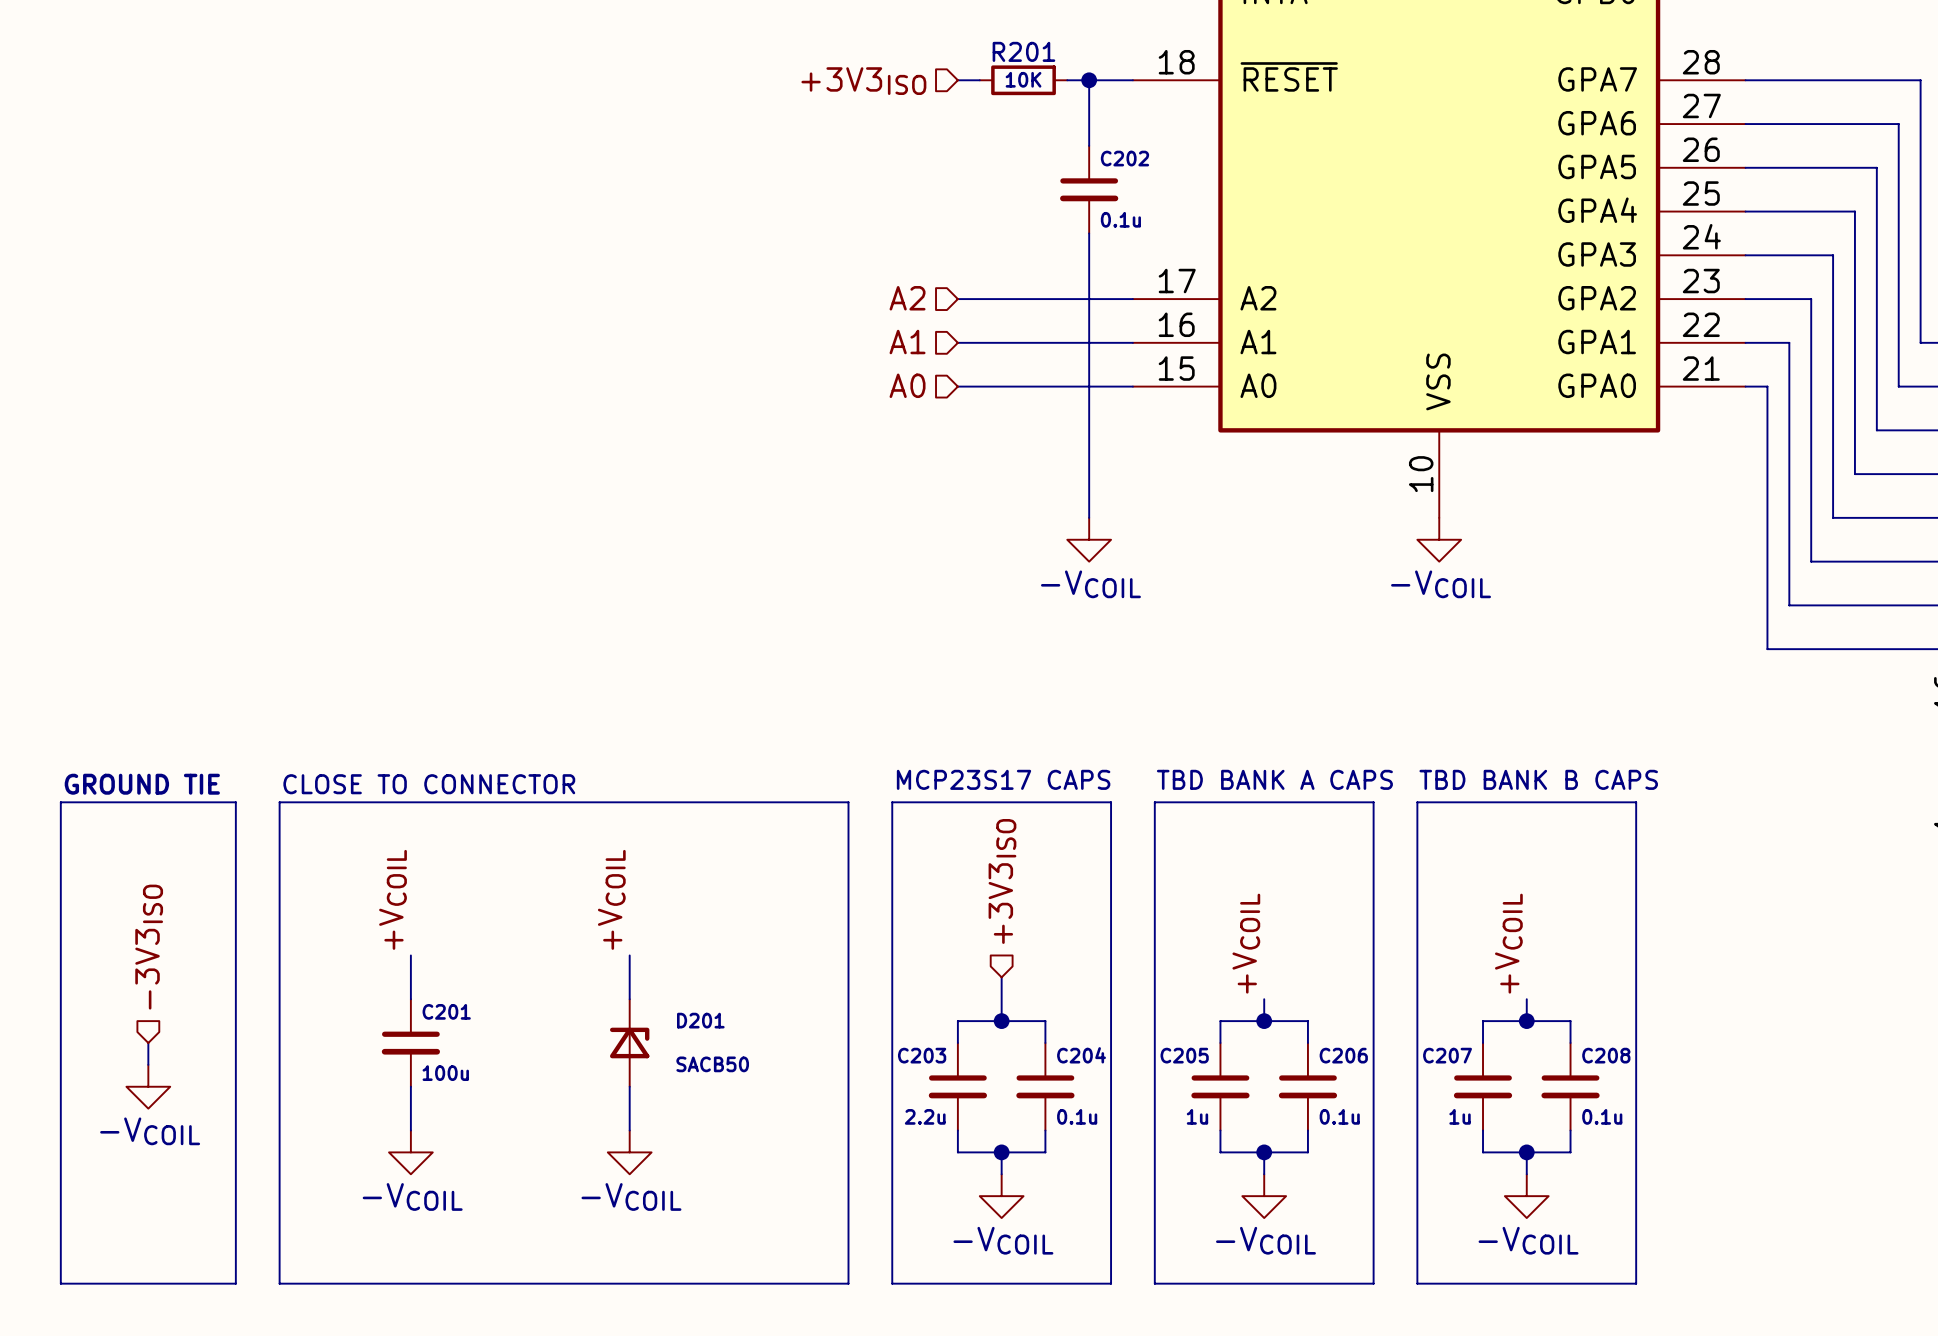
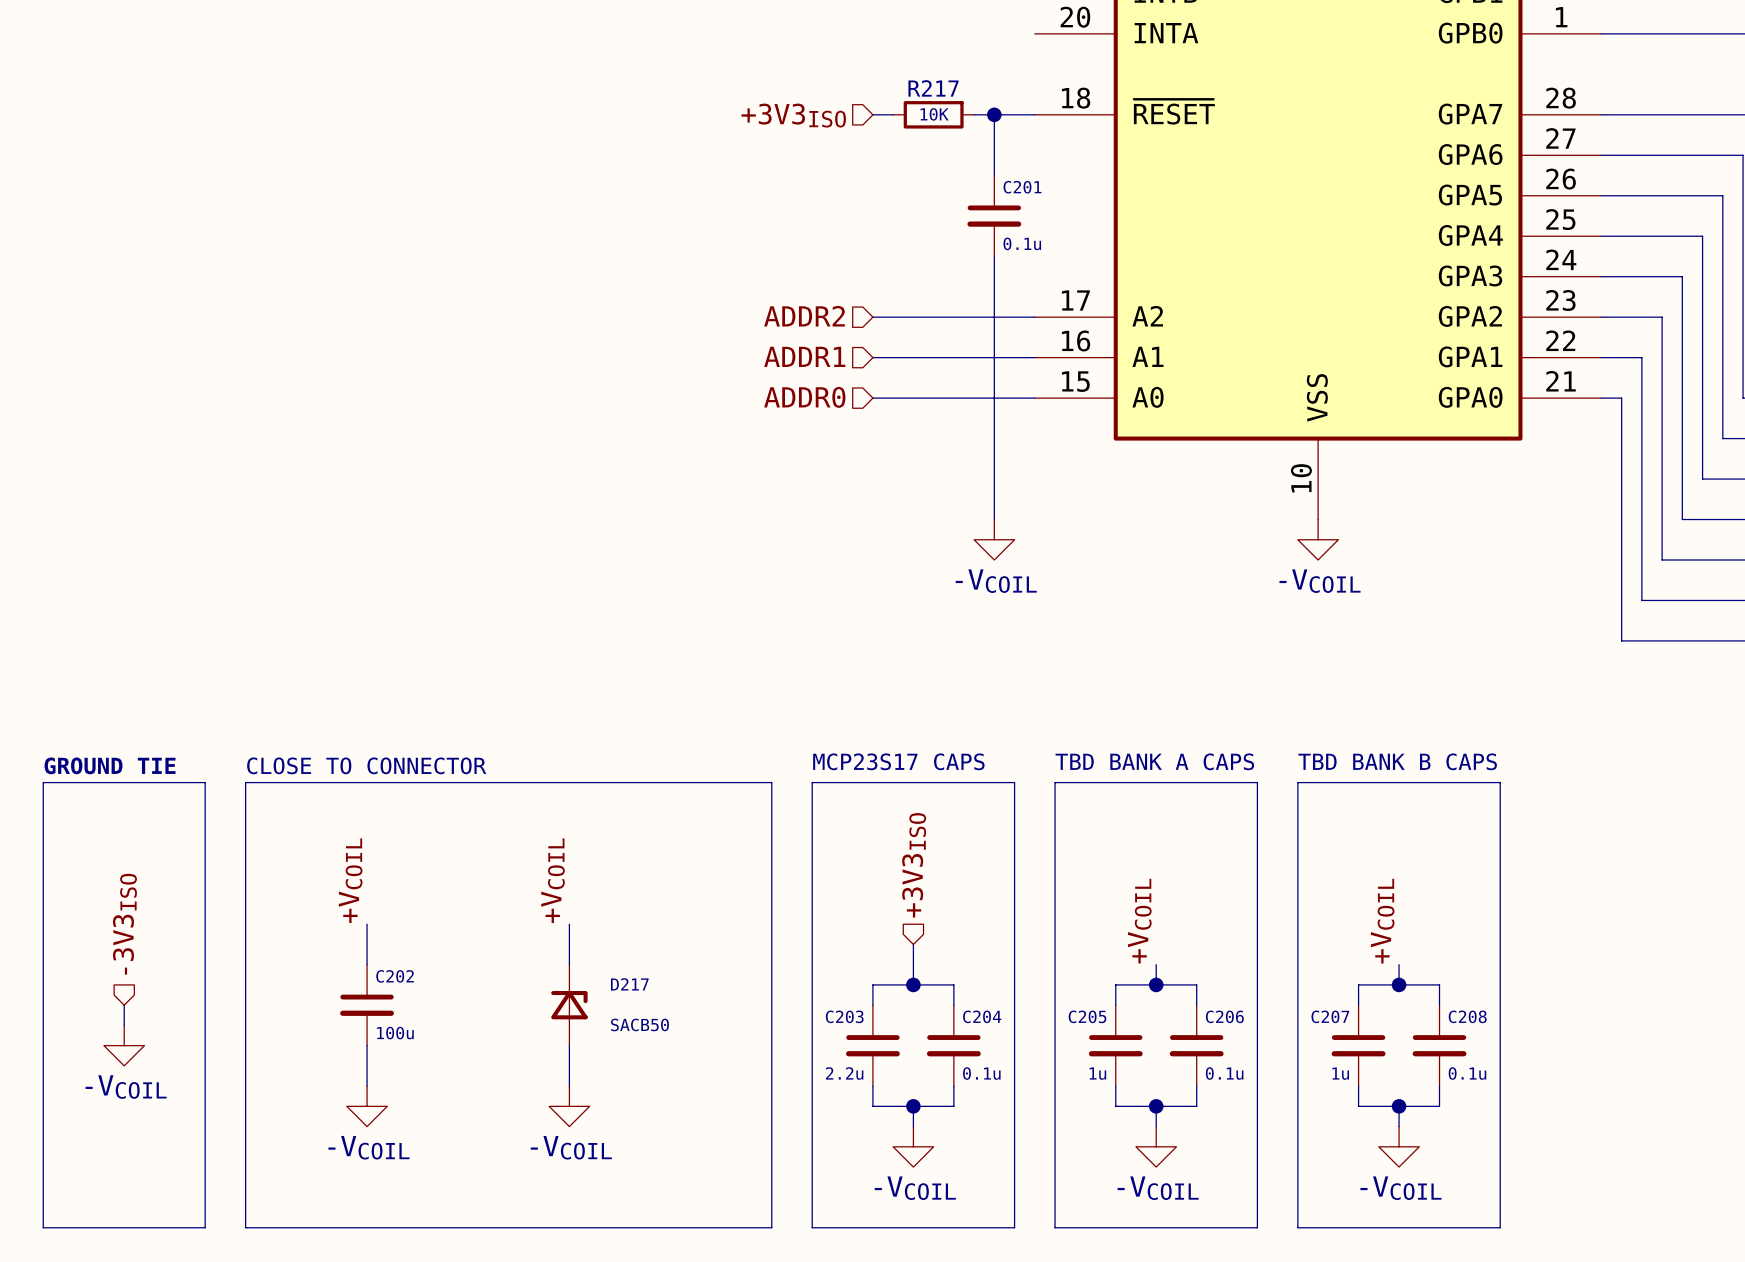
R201 name: R201 (1023, 51) -> R217 (933, 88)
C202 name: C202 (1124, 158) -> C201 (1022, 187)
hierarchical label: A2 (907, 298) -> ADDR2 (804, 316)
hierarchical label: A1 (907, 342) -> ADDR1 (804, 356)
hierarchical label: A0 (907, 385) -> ADDR0 (804, 397)
C201 name: C201 (446, 1011) -> C202 (395, 976)
D201 name: D201 (700, 1020) -> D217 (629, 984)

